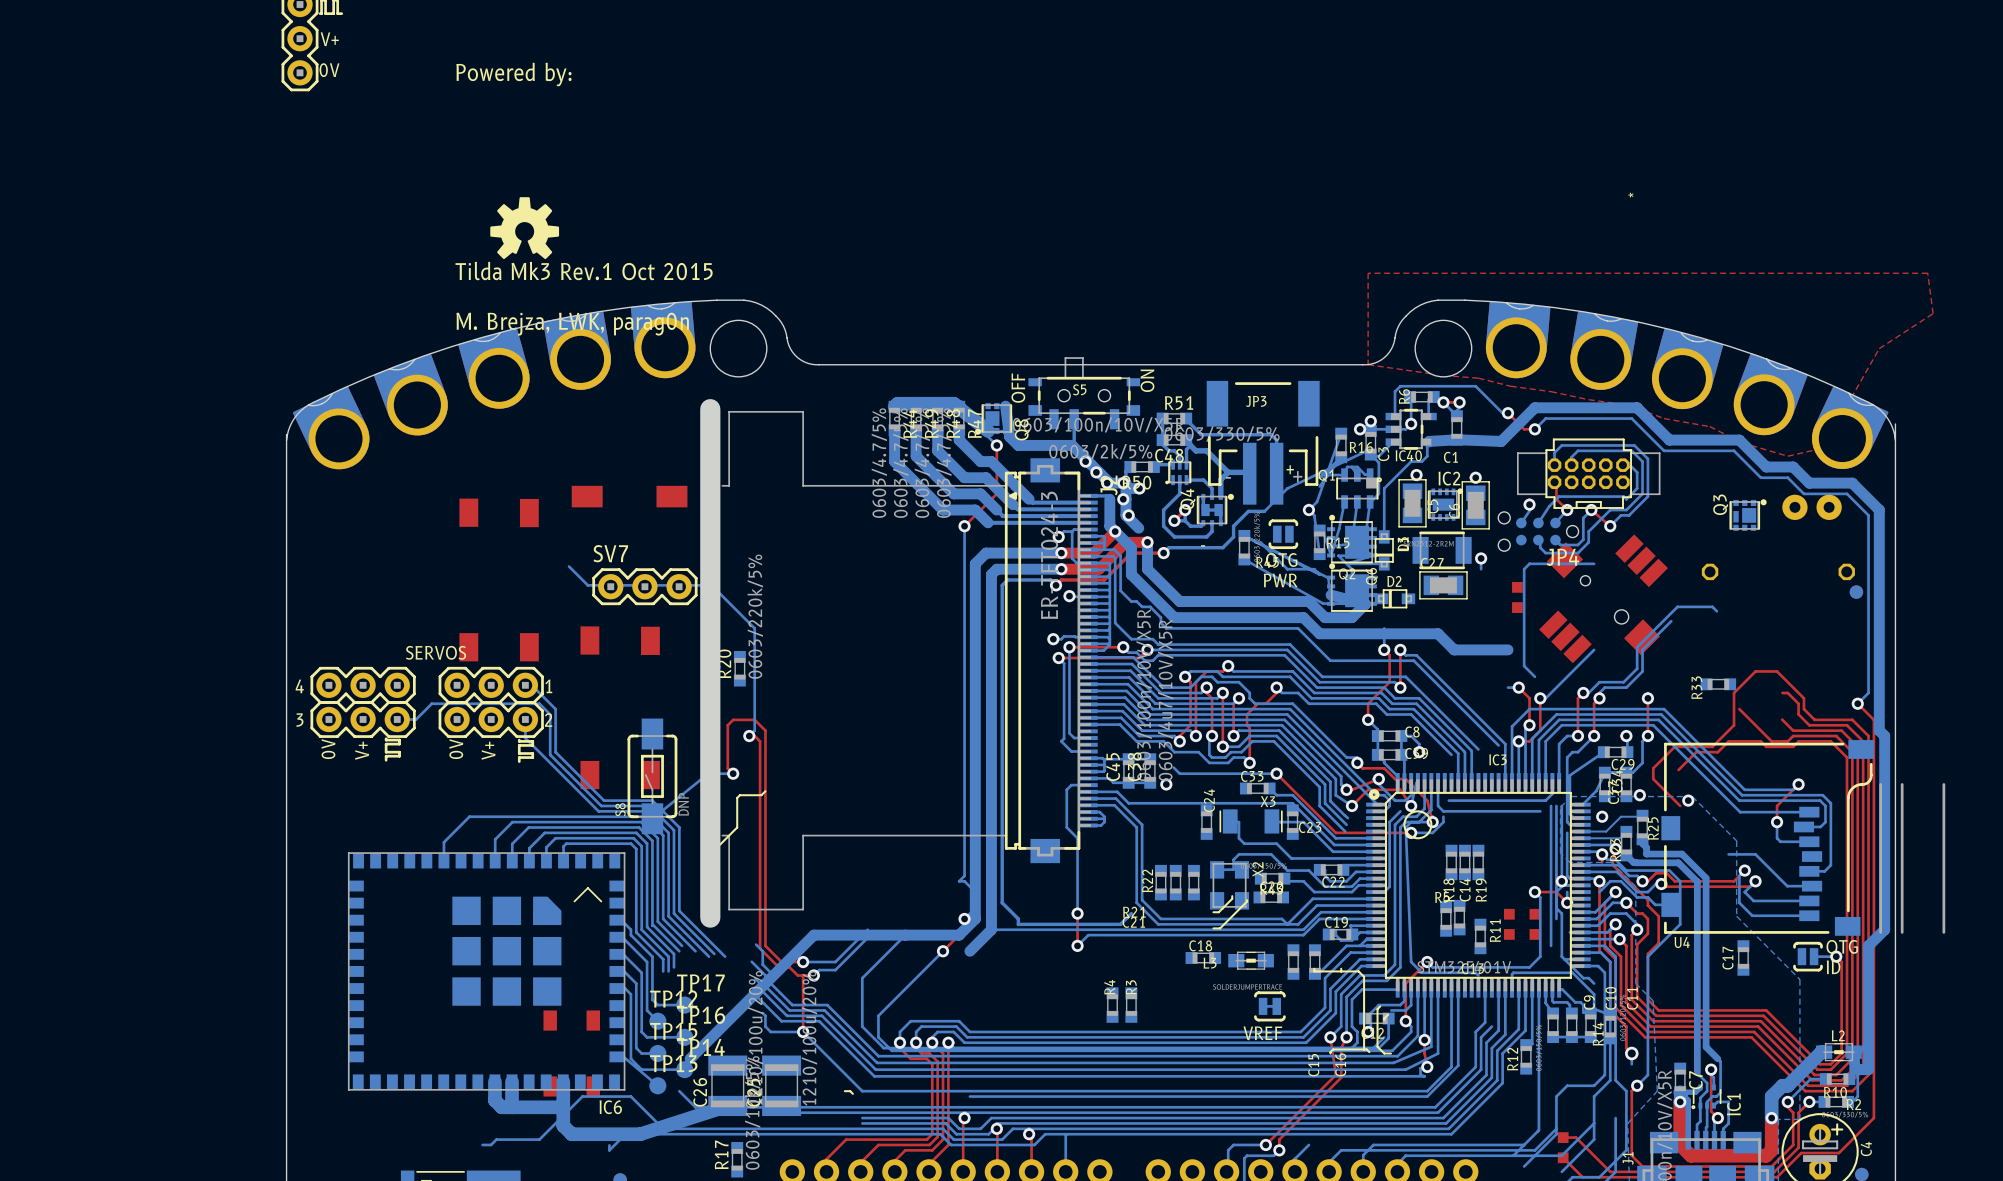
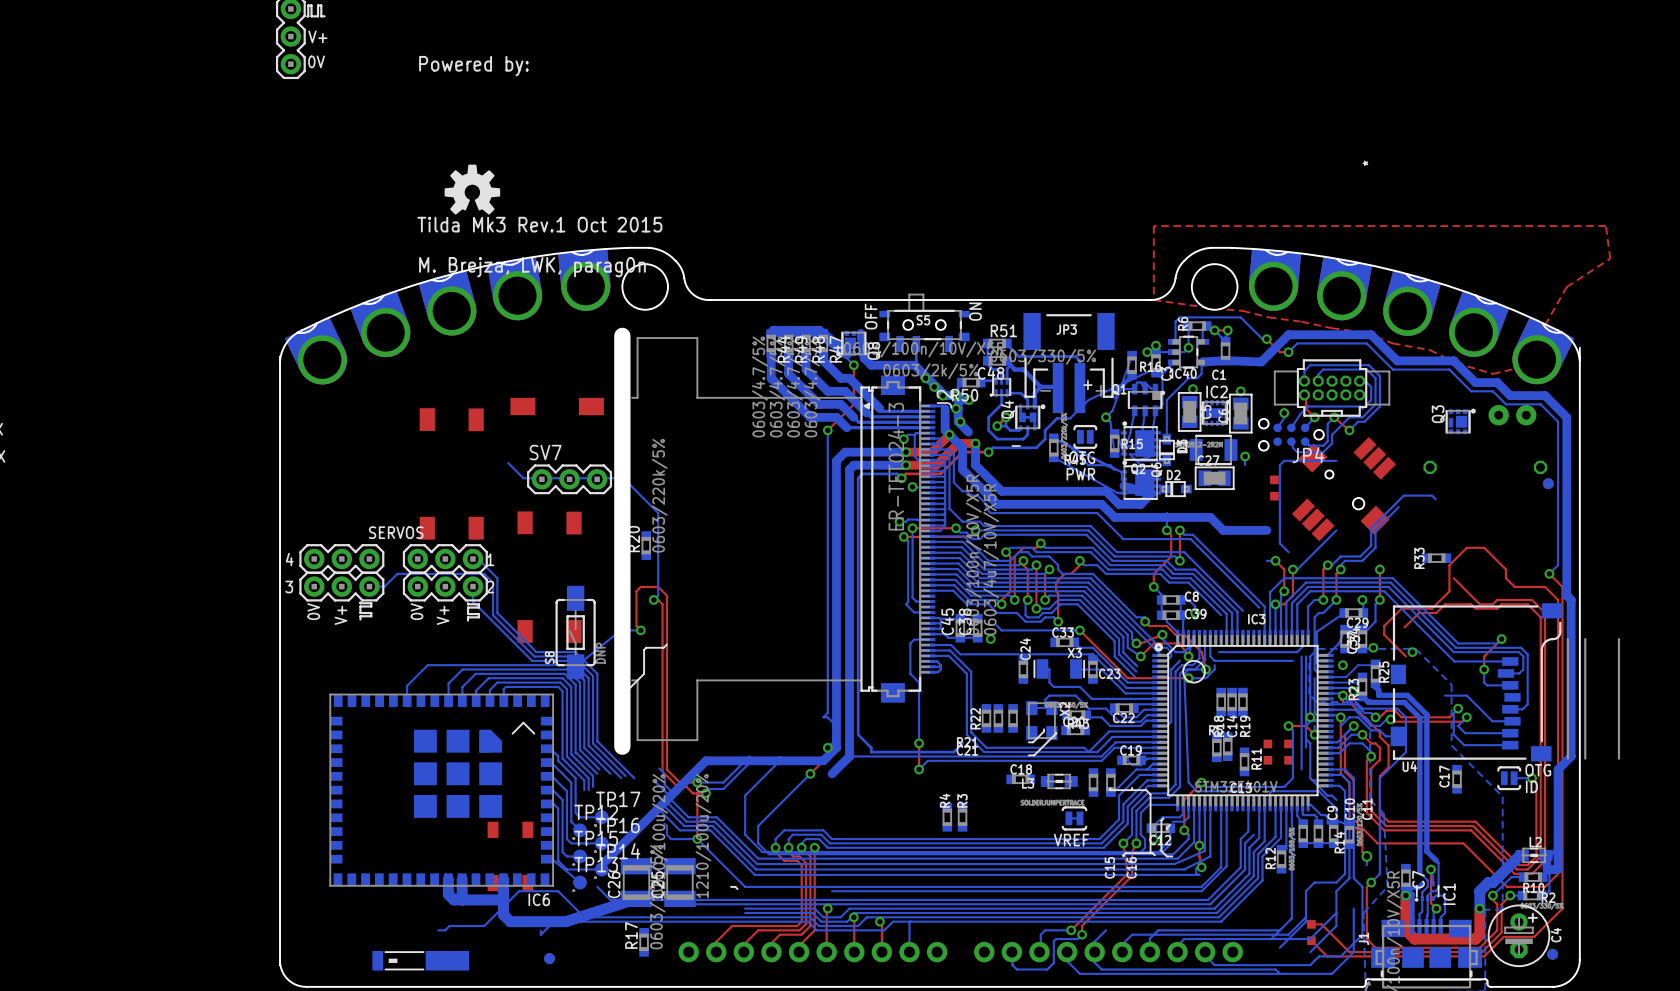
top track: (1782, 692) (1787, 692) (1798, 703) (1798, 714) (1809, 725) (1847, 725) (1863, 741) (1863, 1069) (1847, 1085) (1808, 1085) (1754, 1031) (1647, 1031) (1621, 1005) (1621, 956) (1610, 945) (1610, 929) (1615, 924) -> none
top track: (1782, 719) (1793, 730) (1841, 730) (1857, 746) (1857, 1064) (1841, 1080) (1812, 1080) (1758, 1026) (1650, 1026) (1626, 1002) (1626, 945) (1619, 939) -> none
bottom track: (1615, 924) (1607, 932) (1569, 932) -> none
via: (1615, 924) -> none
bottom track: (1619, 939) (1582, 939) -> none
via: (1619, 939) -> none

